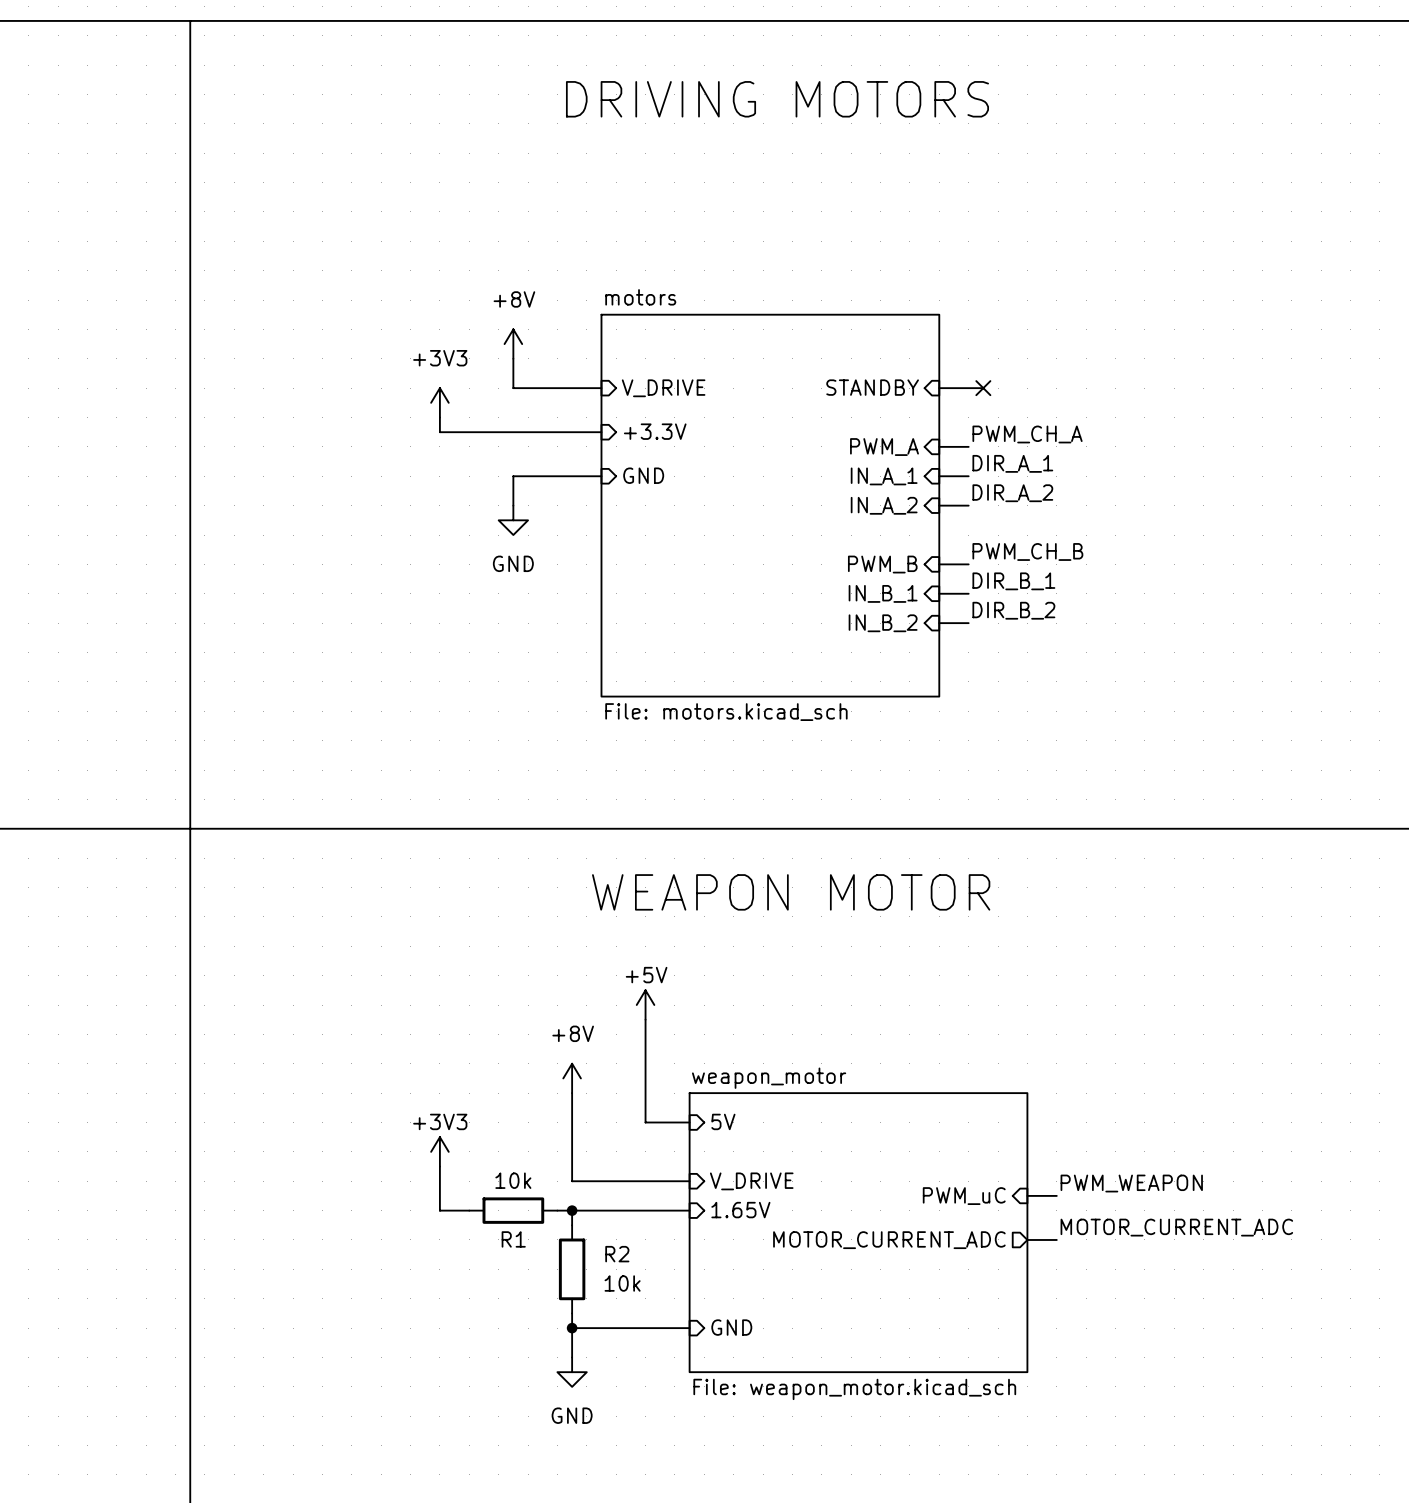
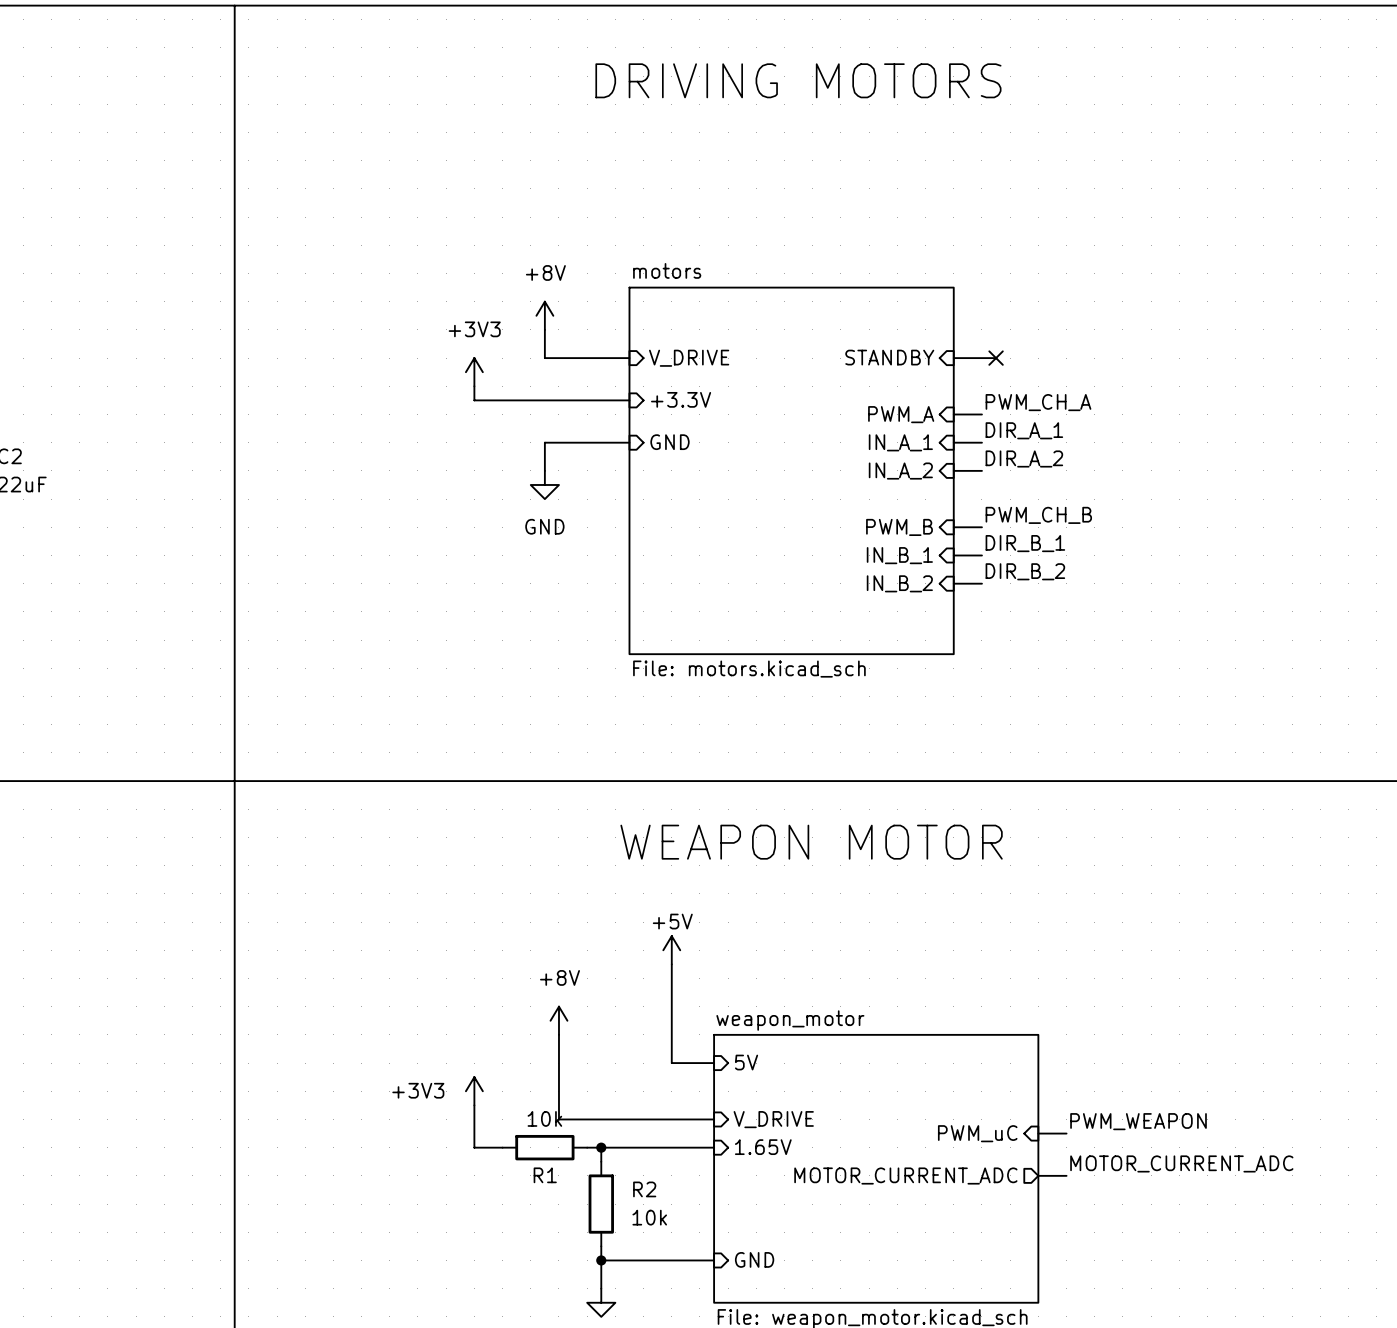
power symbol position: +8V (572, 1078) -> +8V (558, 1020)
wire: (572, 1093) (572, 1181) -> (558, 1034) (558, 1119) (601, 1119)
power symbol text position: +3V3 (440, 1121) -> +3V3 (418, 1090)

